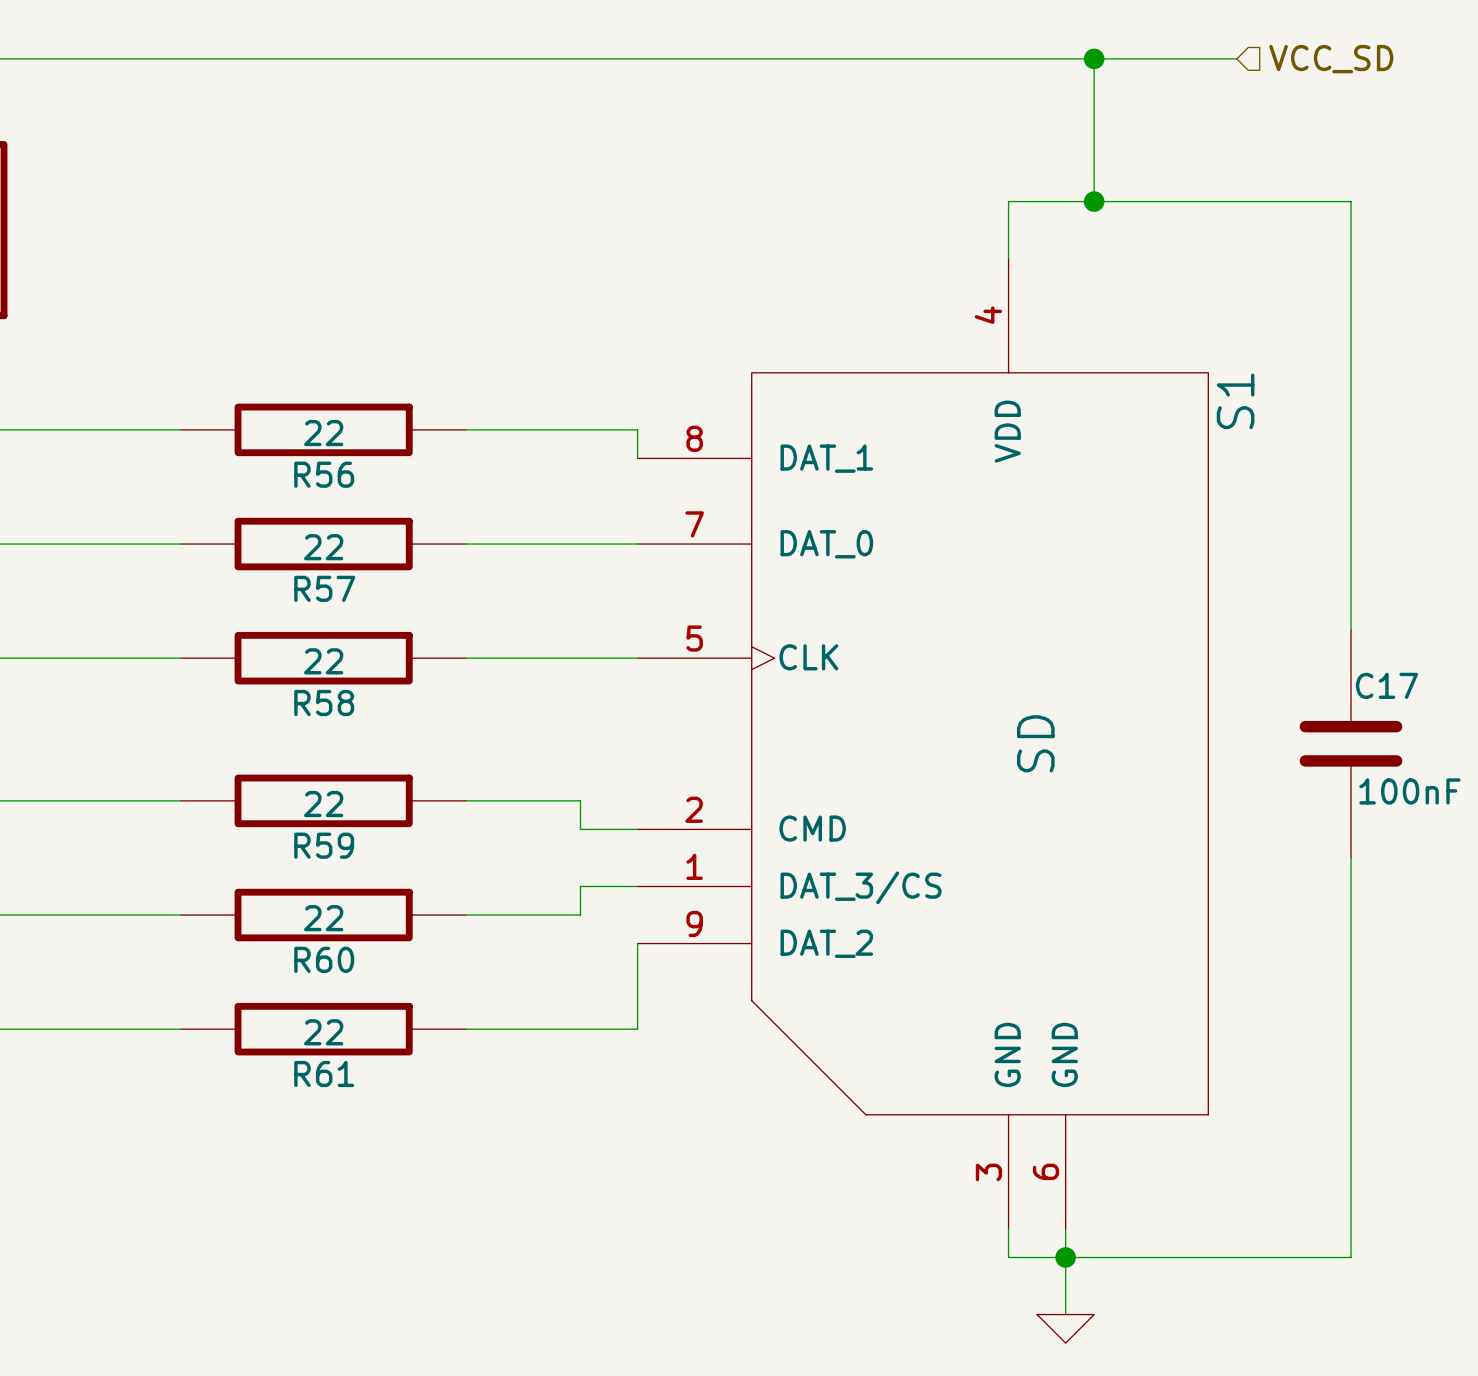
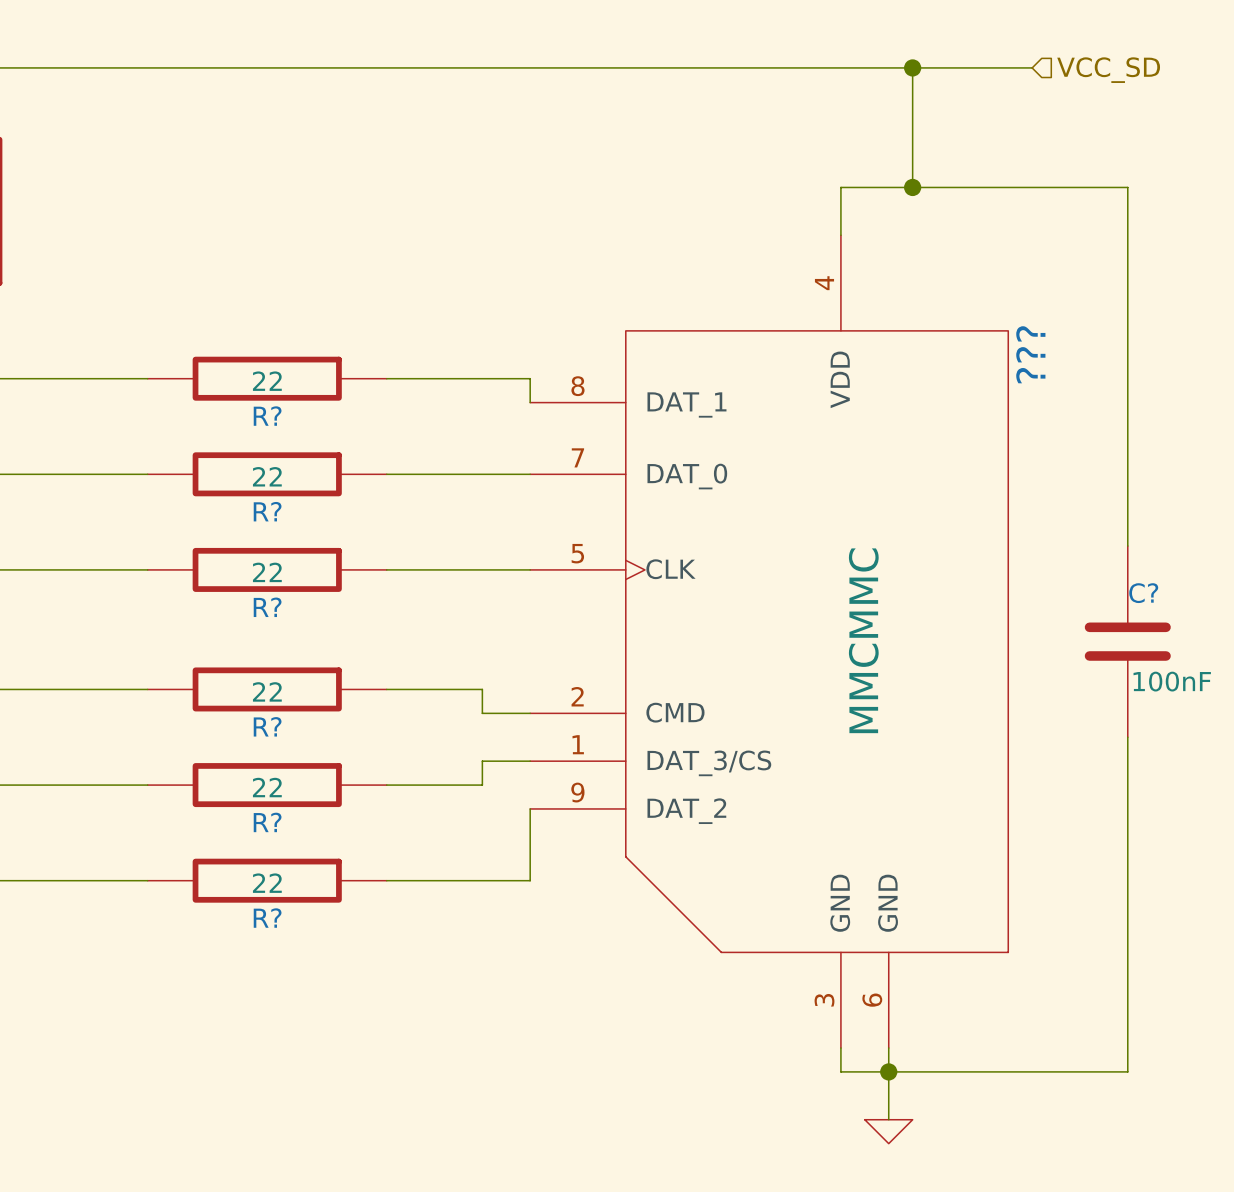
S1 name: S1 (1235, 401) -> ??? (1030, 354)
R56 name: R56 (324, 474) -> R? (267, 416)
R57 name: R57 (324, 588) -> R? (267, 511)
C17 name: C17 (1386, 685) -> C? (1143, 593)
R58 name: R58 (324, 702) -> R? (267, 607)
S1 value: SD (1035, 743) -> MMCMMC (863, 640)
R59 name: R59 (324, 845) -> R? (267, 726)
R60 name: R60 (324, 959) -> R? (267, 822)
R61 name: R61 (324, 1073) -> R? (267, 918)

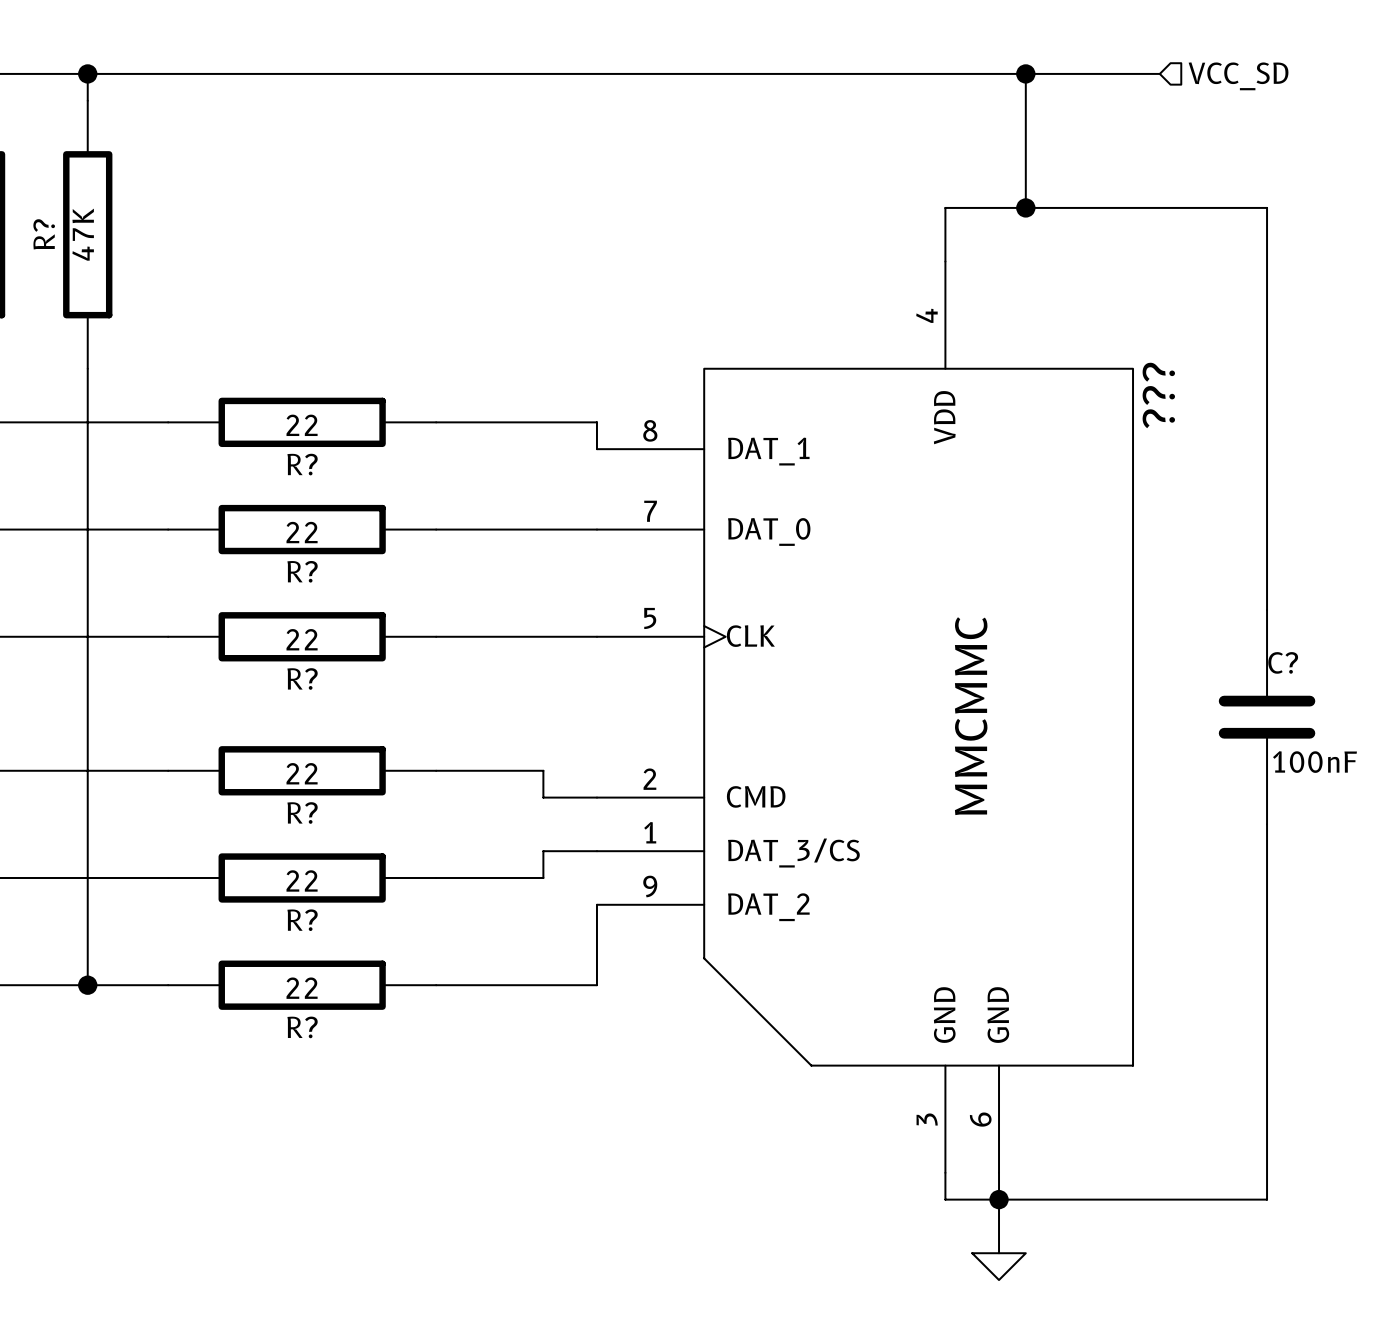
wire: none -> (87, 73) (87, 100)
junction: none -> (87, 73)
R?: none -> 47K (87, 234)
wire: none -> (87, 368) (87, 985)
junction: none -> (87, 985)

